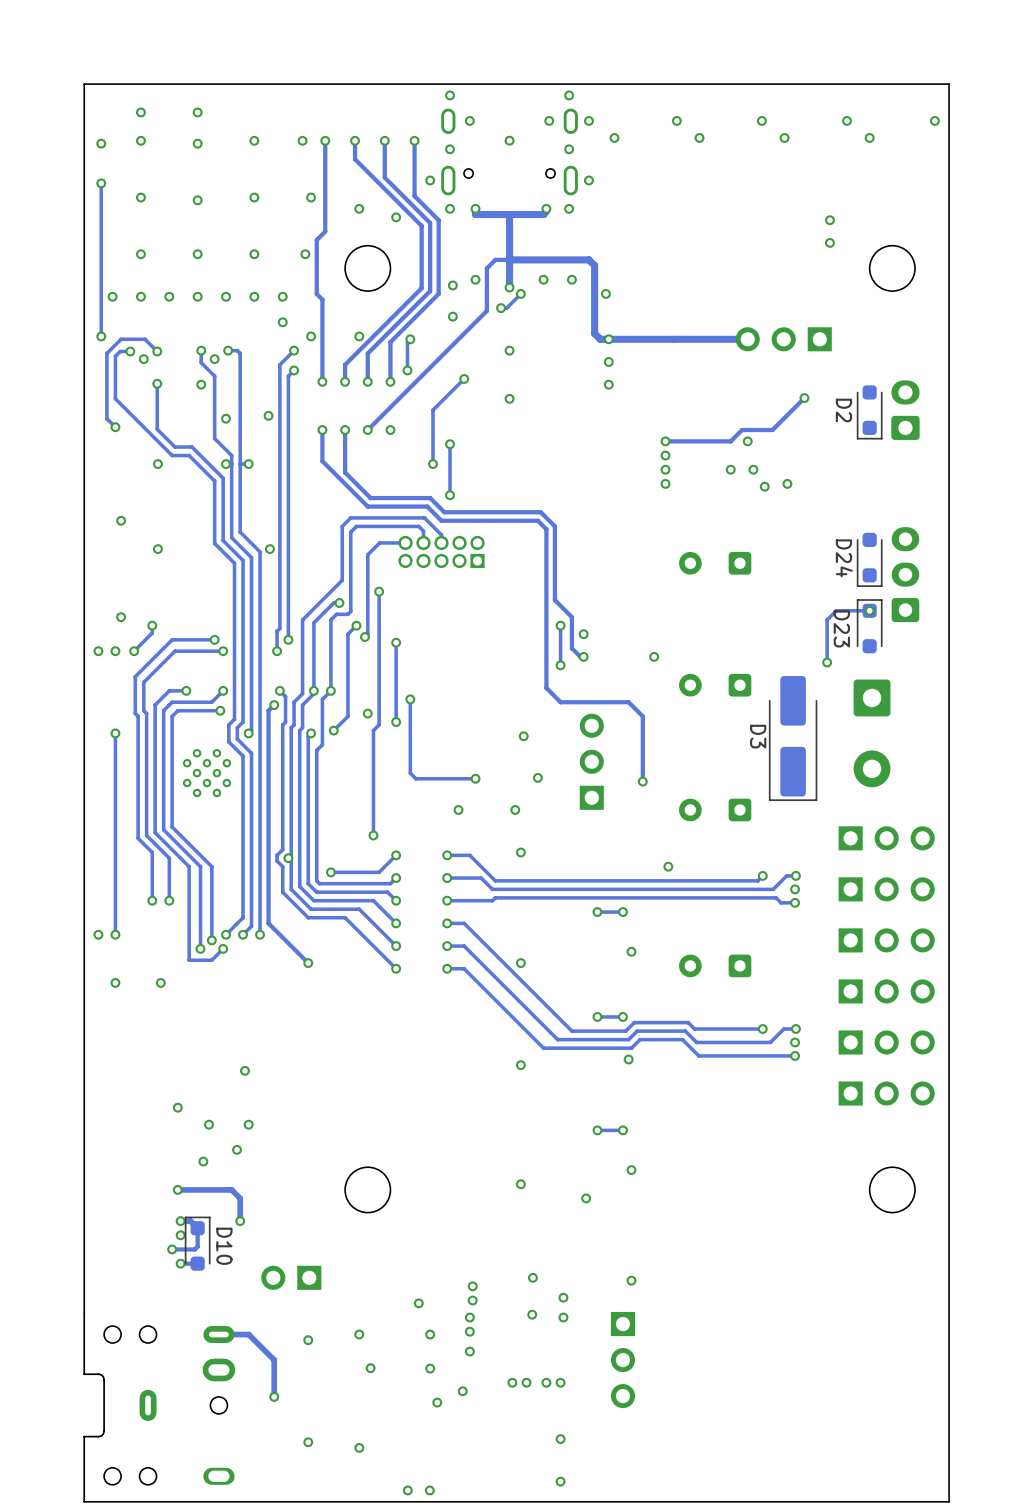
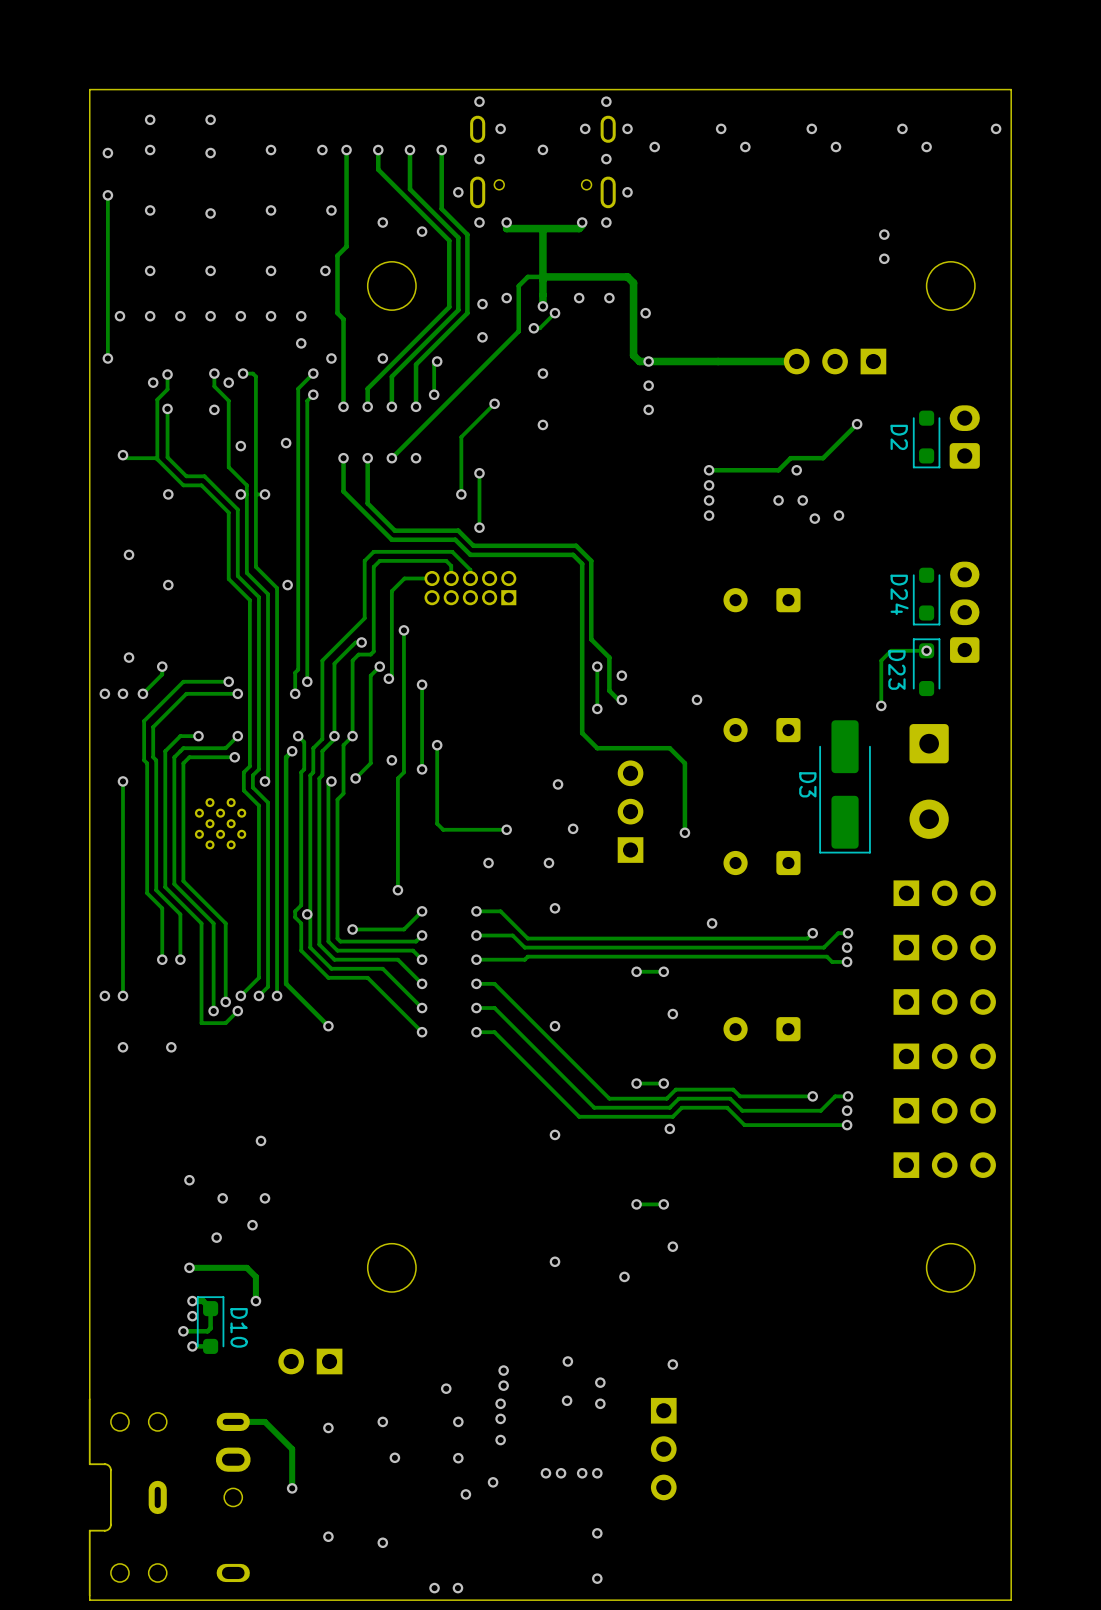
track: (130, 351) (120, 351) (115, 356) (115, 398) (146, 430) -> (126, 458) (156, 458)
via: (130, 351) -> none
track: (157, 351) (145, 339) (121, 339) (106, 353) (106, 418) (115, 427) -> (167, 374) (167, 389) (157, 399) (157, 459)

